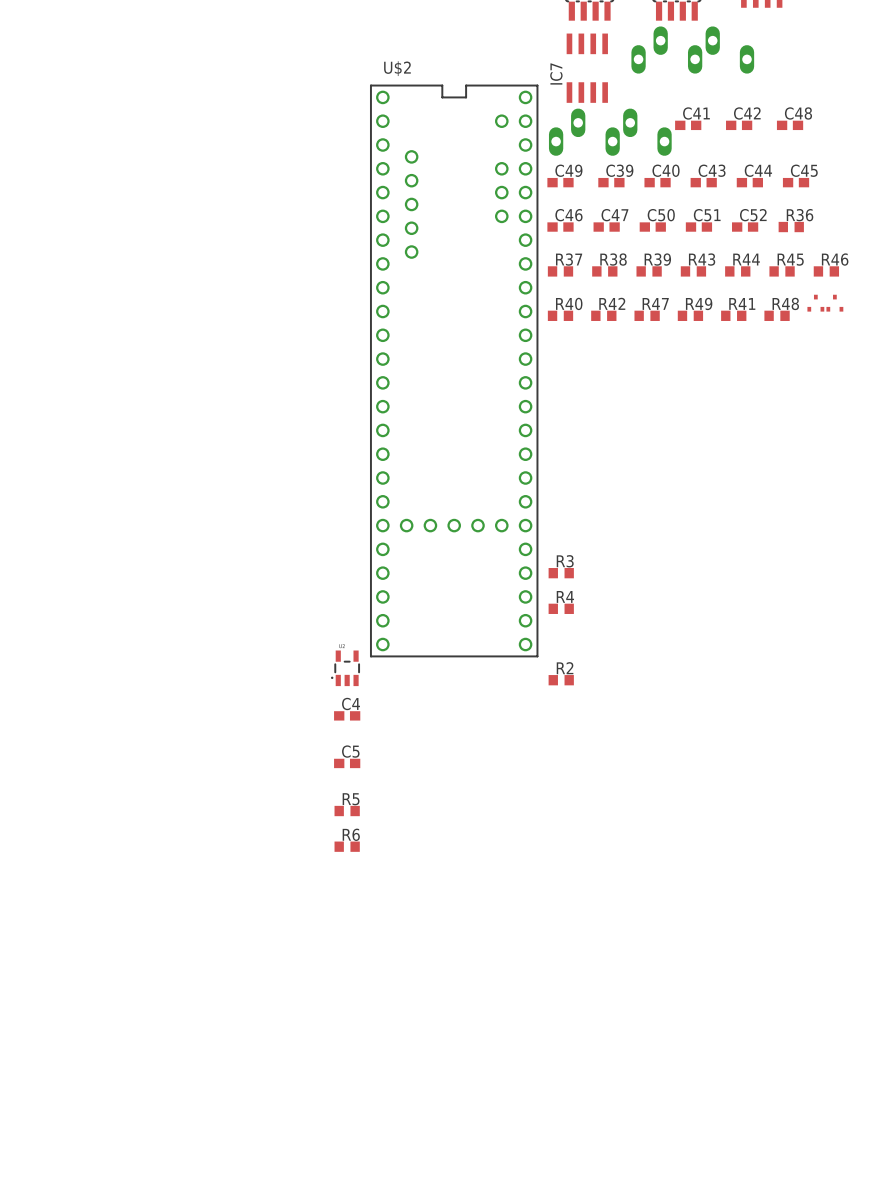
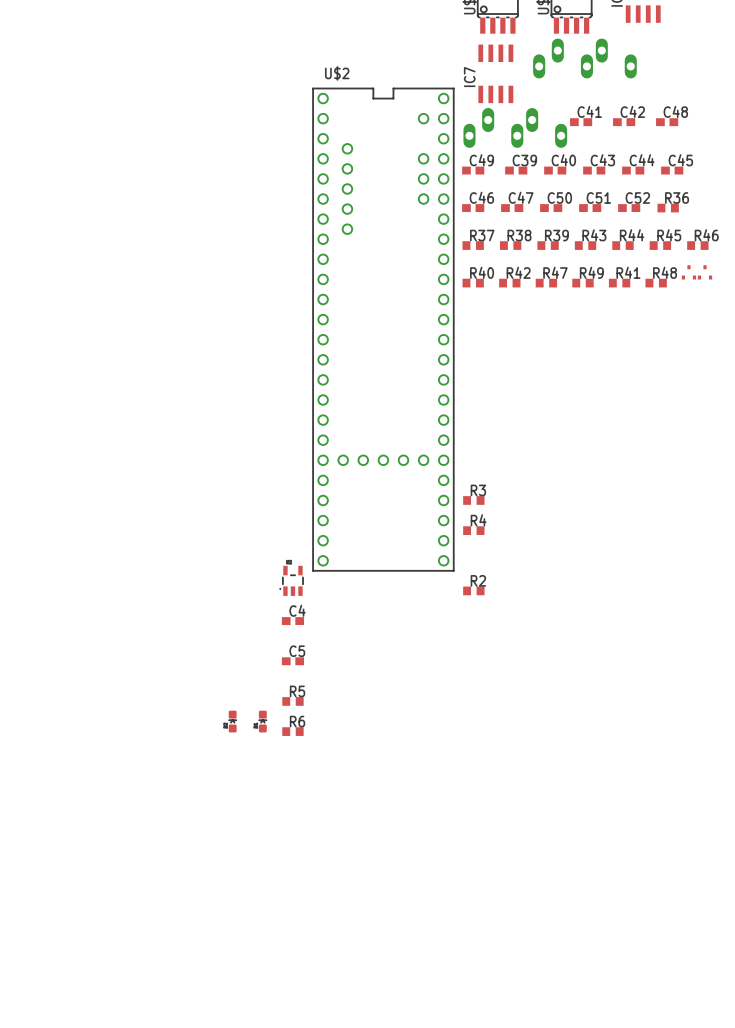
part: none -> (232, 721)
part: none -> (262, 721)

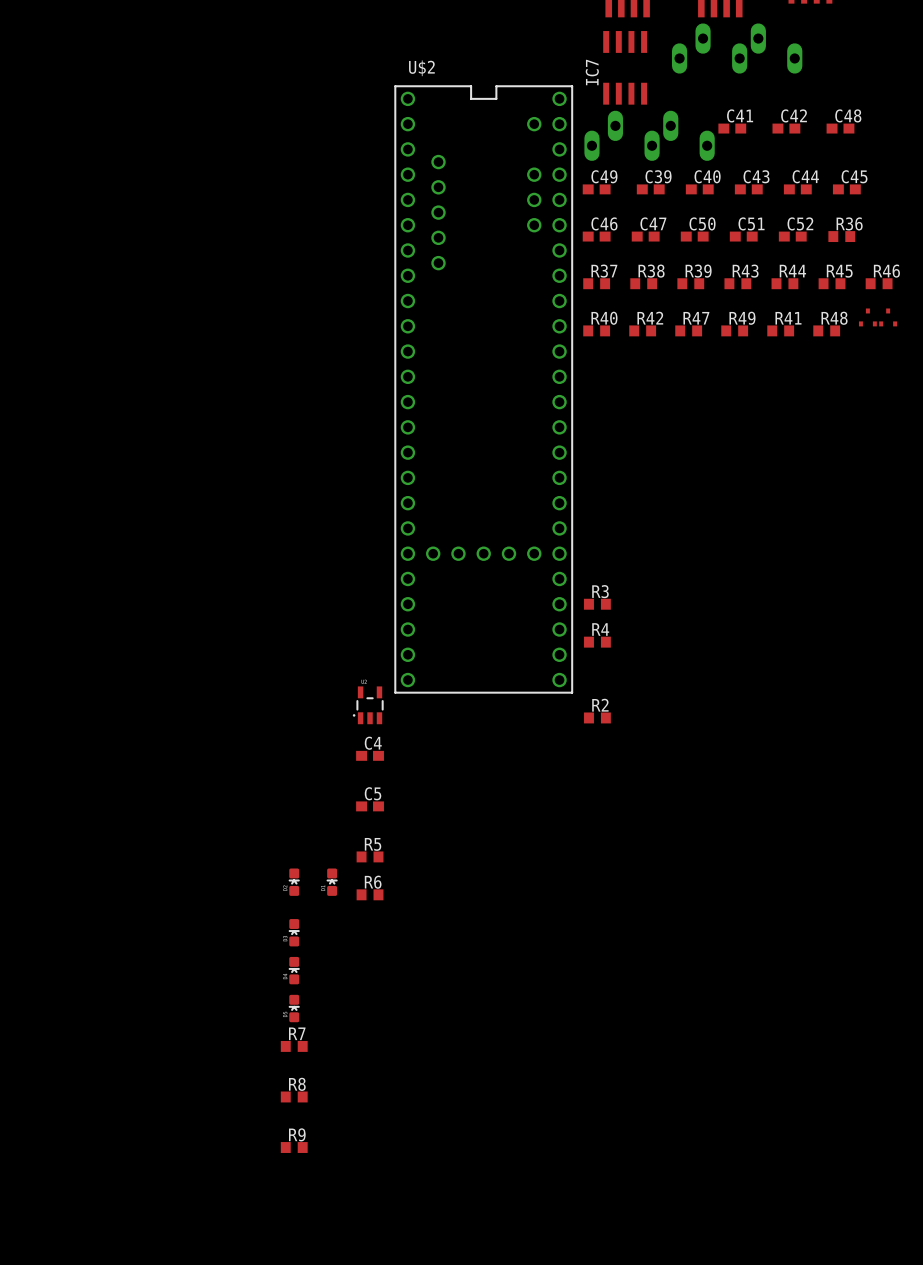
part: none -> (294, 932)
part: none -> (294, 970)
part: none -> (294, 1008)
R7: none -> (294, 1046)
R8: none -> (294, 1096)
R9: none -> (294, 1147)

